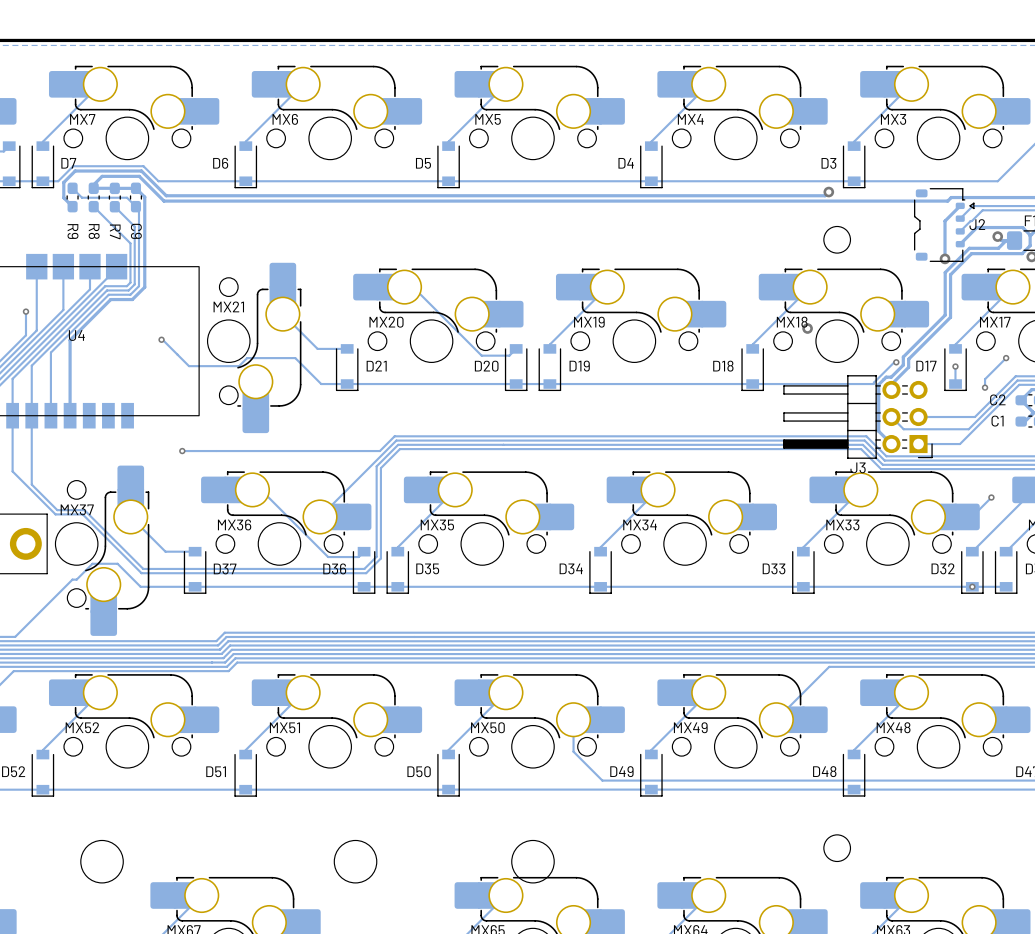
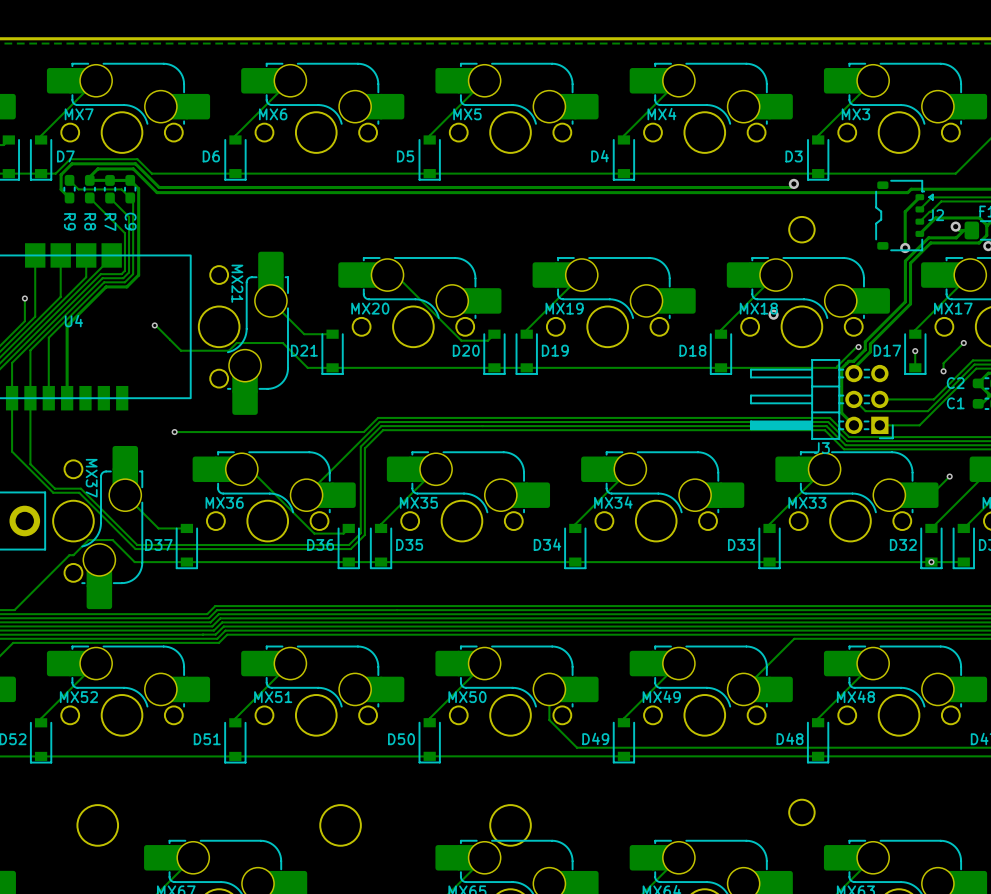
MX21 name rotation: 0° (228, 306) -> 90° clockwise (237, 283)
D21 name position: D21 (376, 366) -> D21 (304, 350)
MX37 name rotation: 0° (77, 509) -> 90° clockwise (91, 478)
D37 name position: D37 (225, 569) -> D37 (158, 544)

